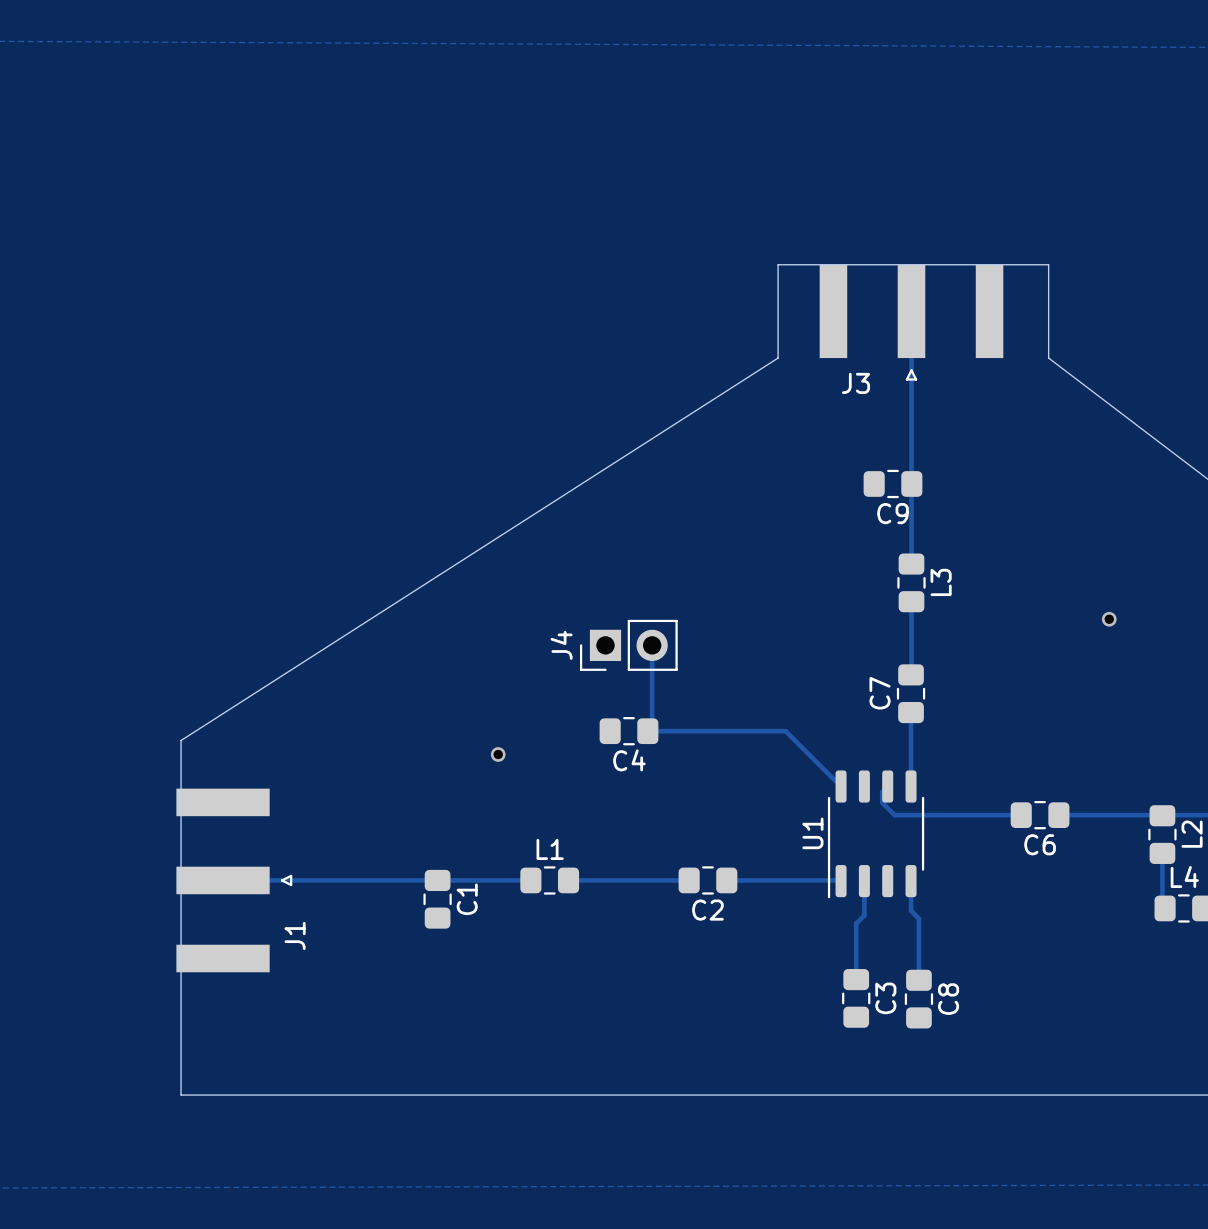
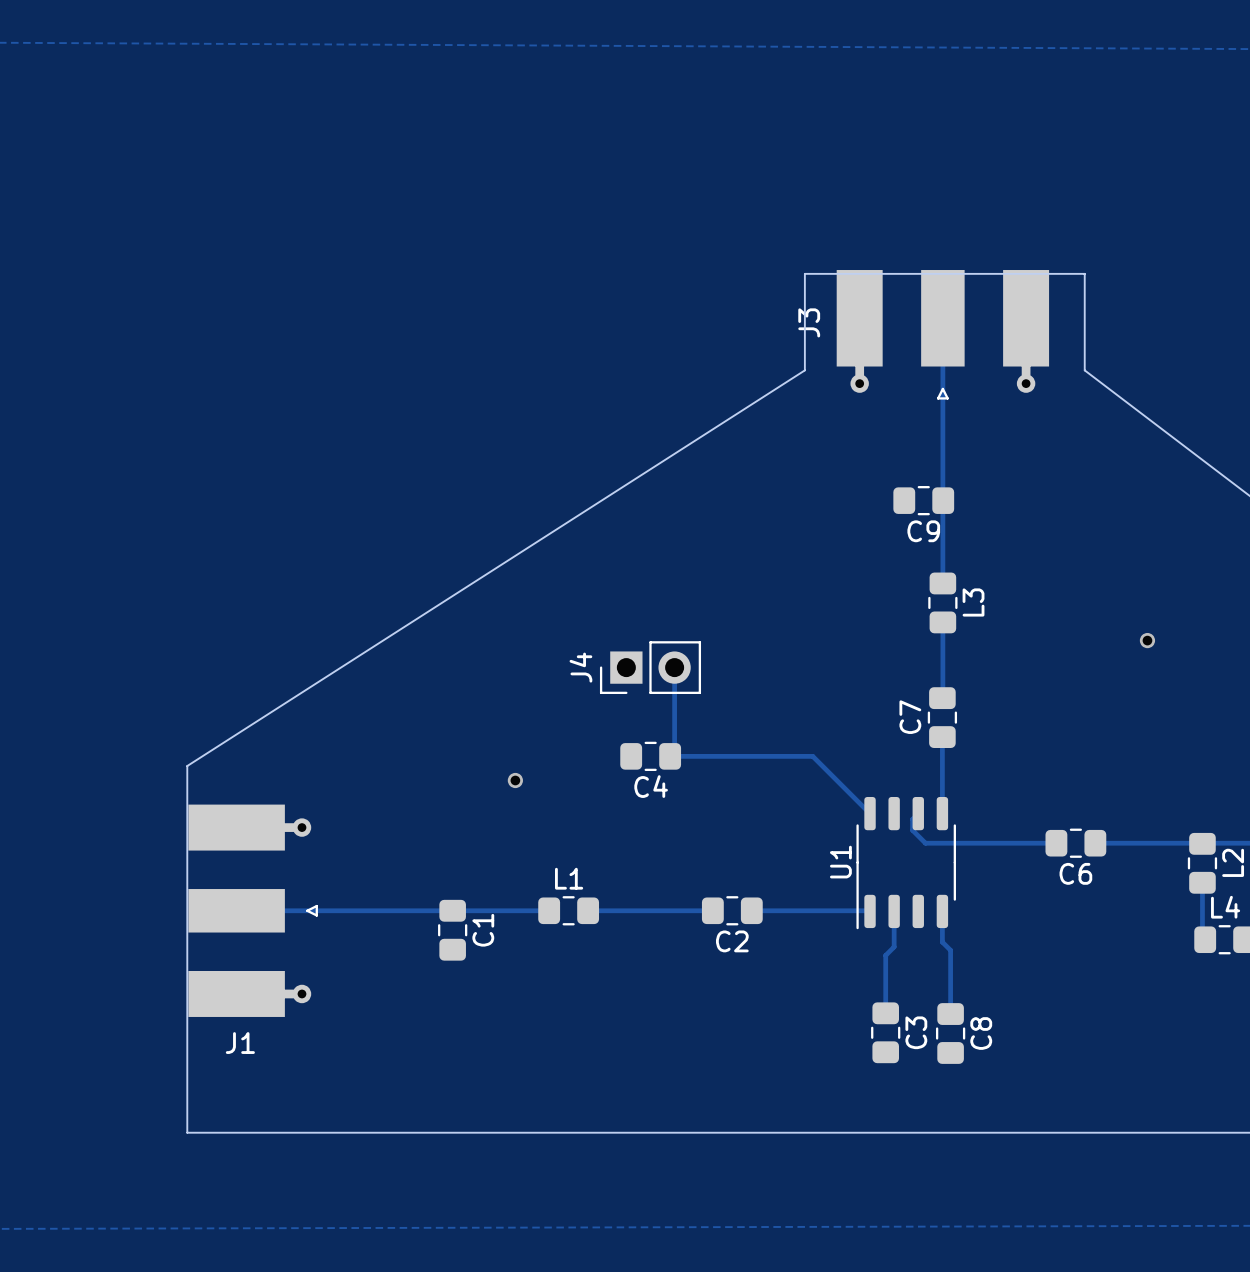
J3 footprint: [819, 264, 1004, 381] -> [836, 270, 1050, 400]
J3 name position: J3 (855, 383) -> J3 (809, 322)
J1 footprint: [176, 788, 293, 973] -> [188, 804, 318, 1017]
J1 name position: J1 (295, 935) -> J1 (240, 1043)

